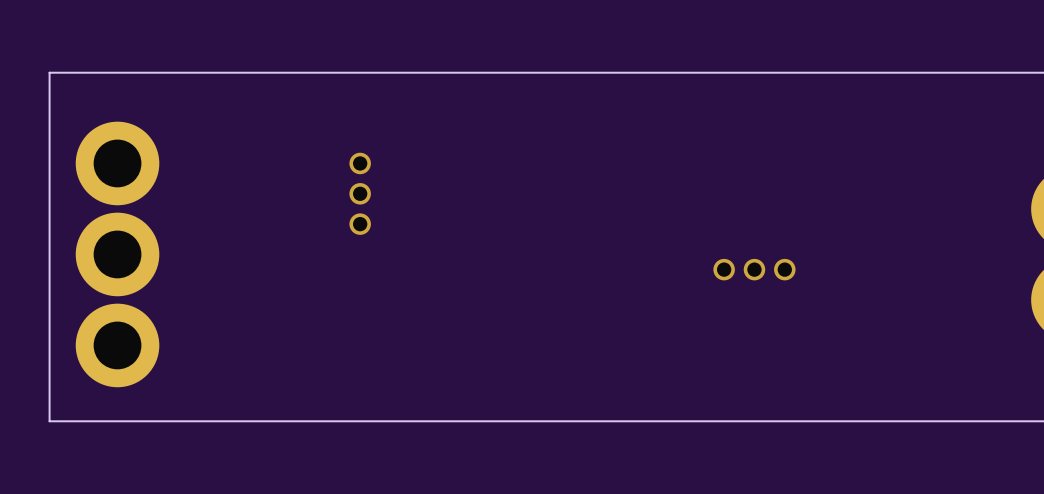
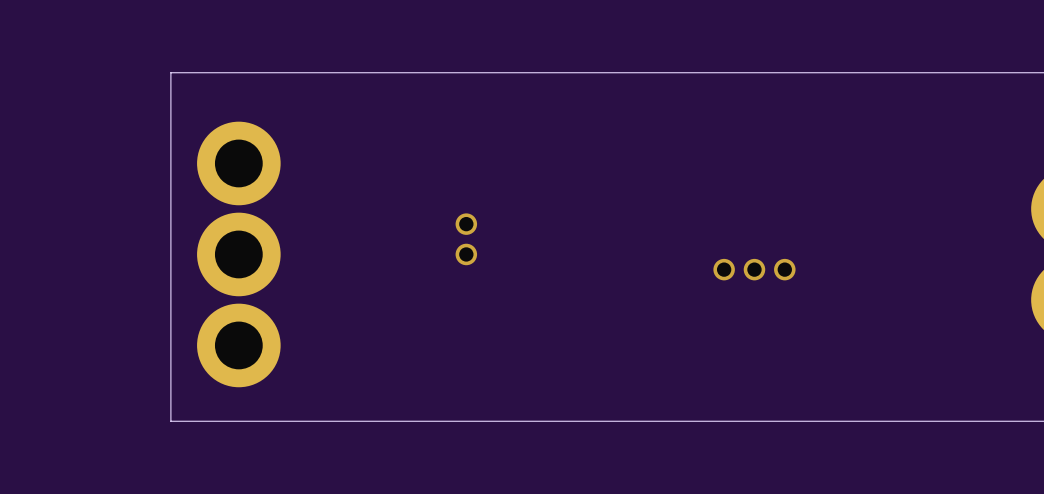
board edge: (170, 72) (49, 72) (49, 421) (170, 421) -> (170, 72) (170, 421)
via: (360, 163) -> none
via: (360, 193) -> none
via: (360, 224) -> none
via: none -> (466, 224)
part position: (117, 254) -> (238, 254)
via: none -> (466, 254)

